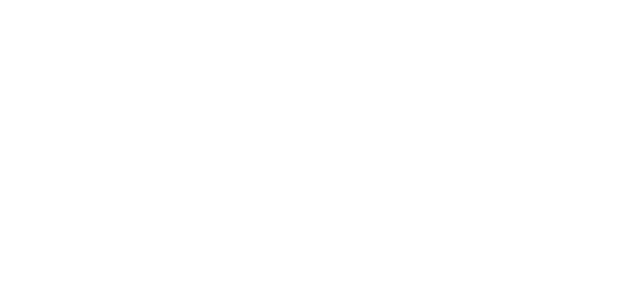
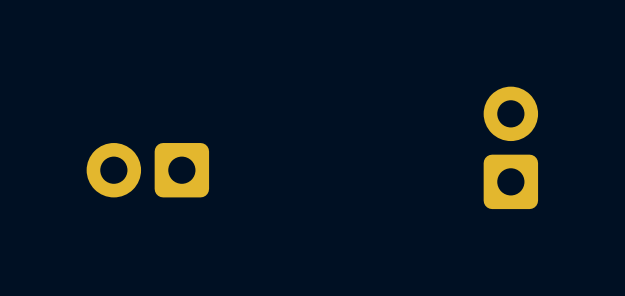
part: none -> (510, 147)
part: none -> (147, 170)

